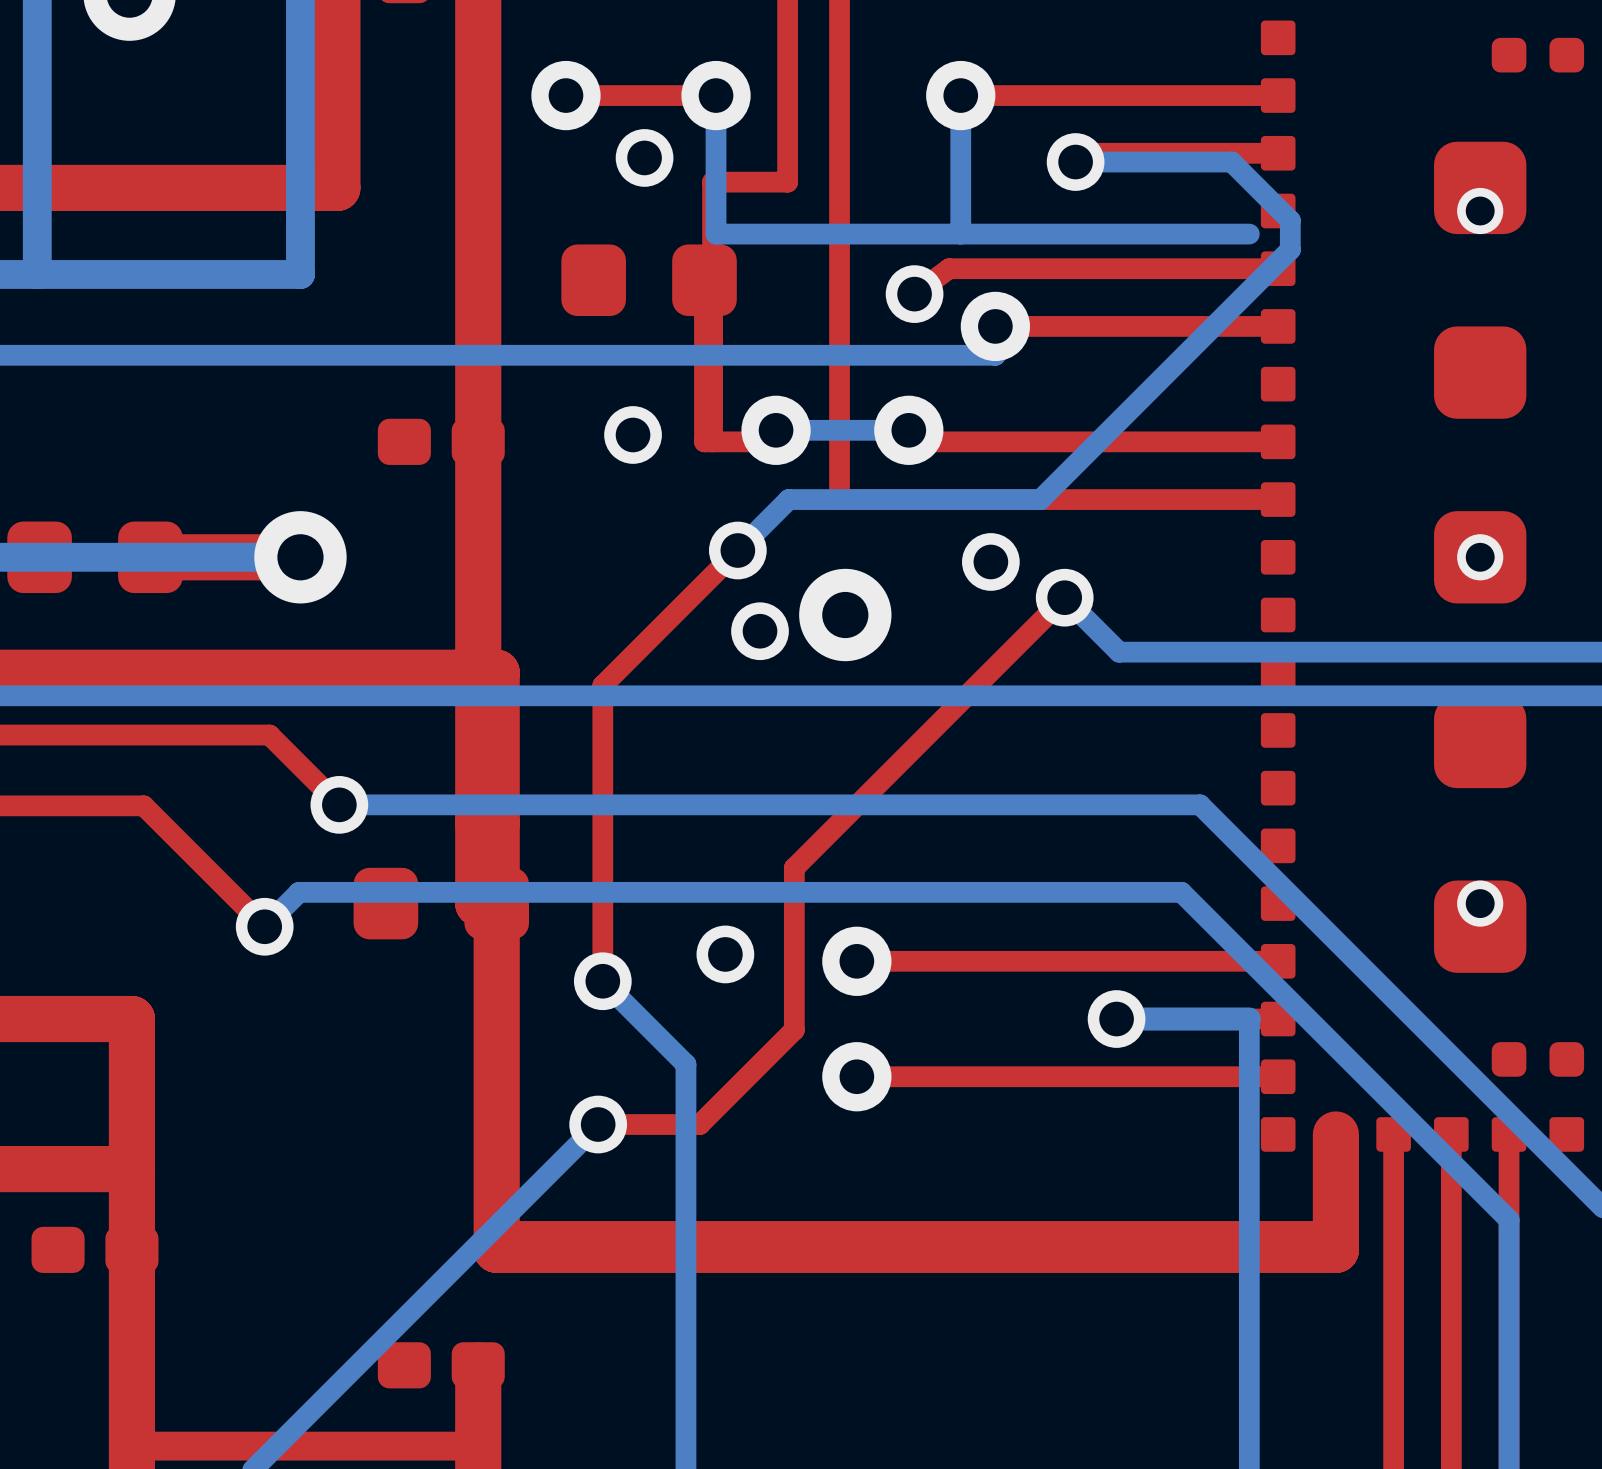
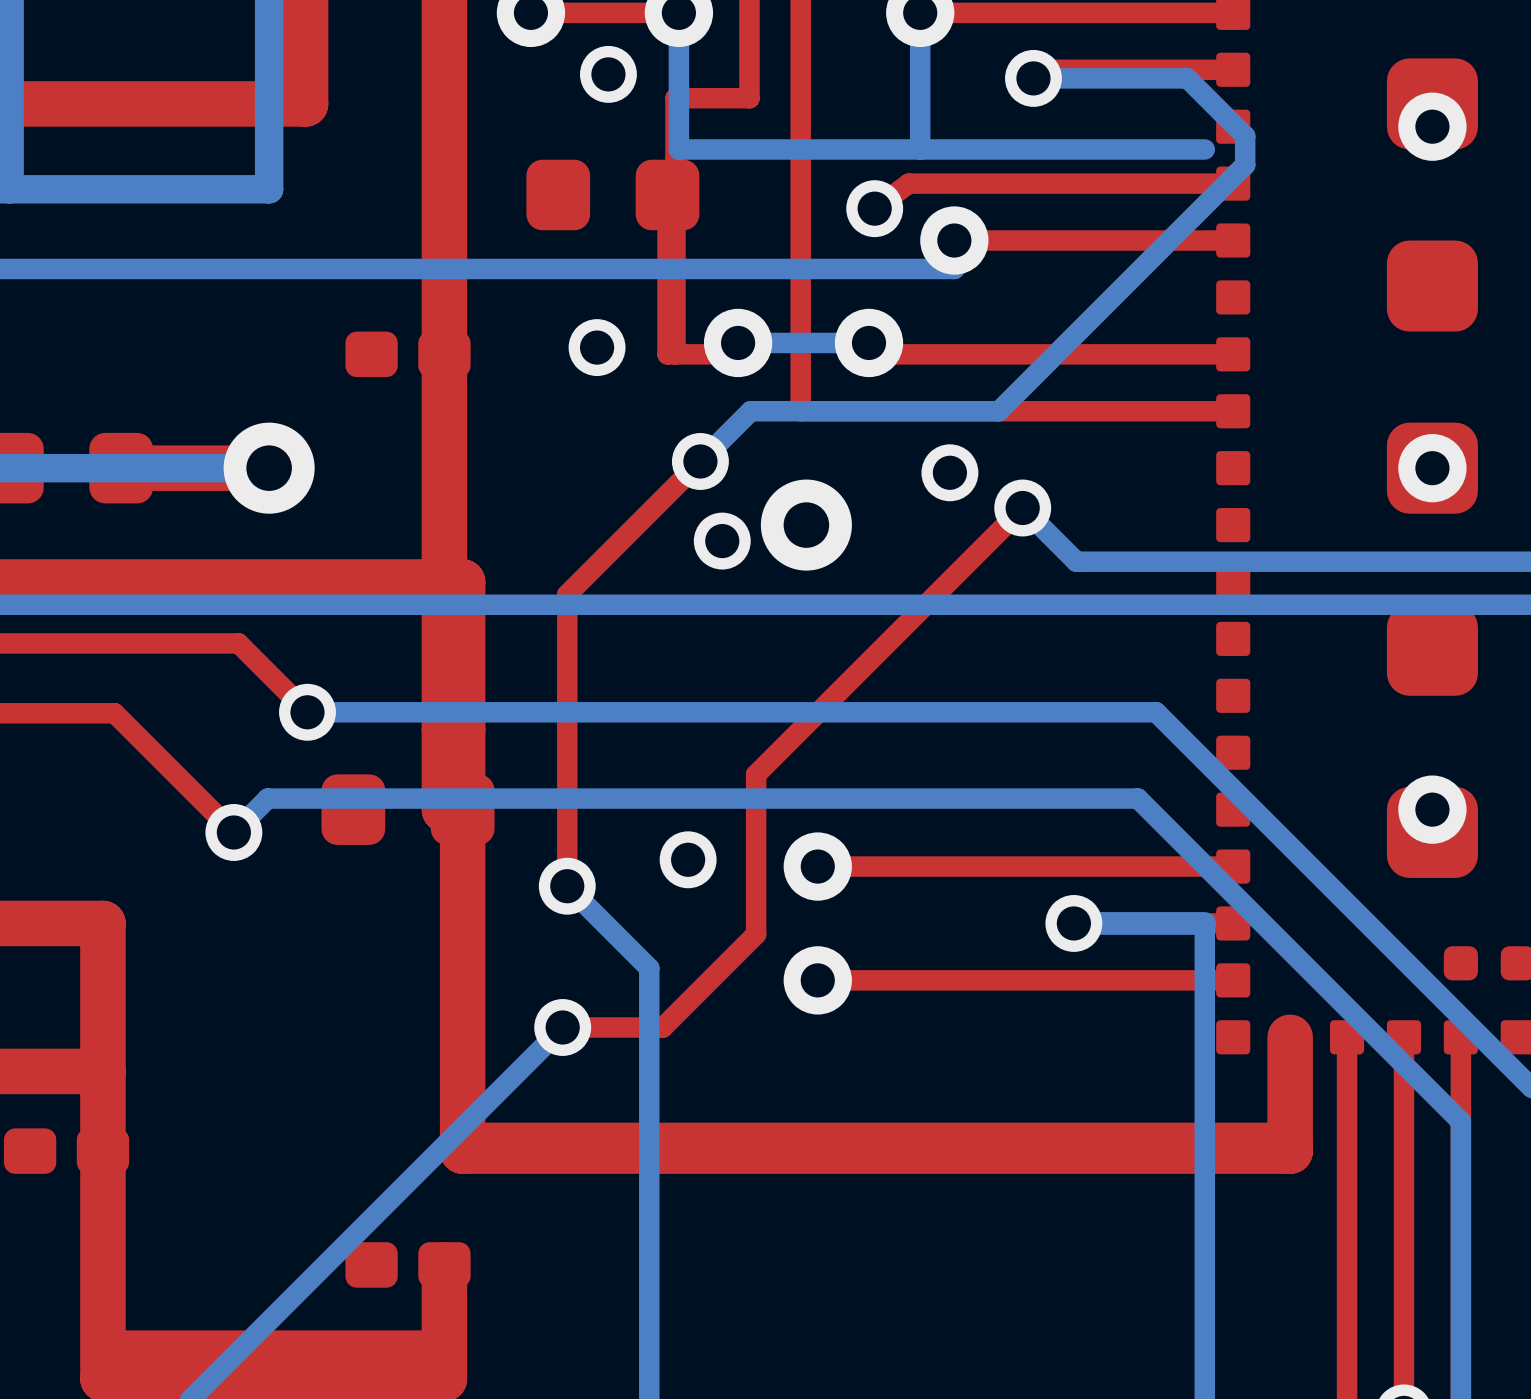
via size: [1457, 187, 1504, 235] -> [1398, 92, 1467, 161]
via size: [1457, 534, 1504, 581] -> [1398, 434, 1467, 503]
via size: [1457, 880, 1504, 927] -> [1398, 775, 1467, 844]

